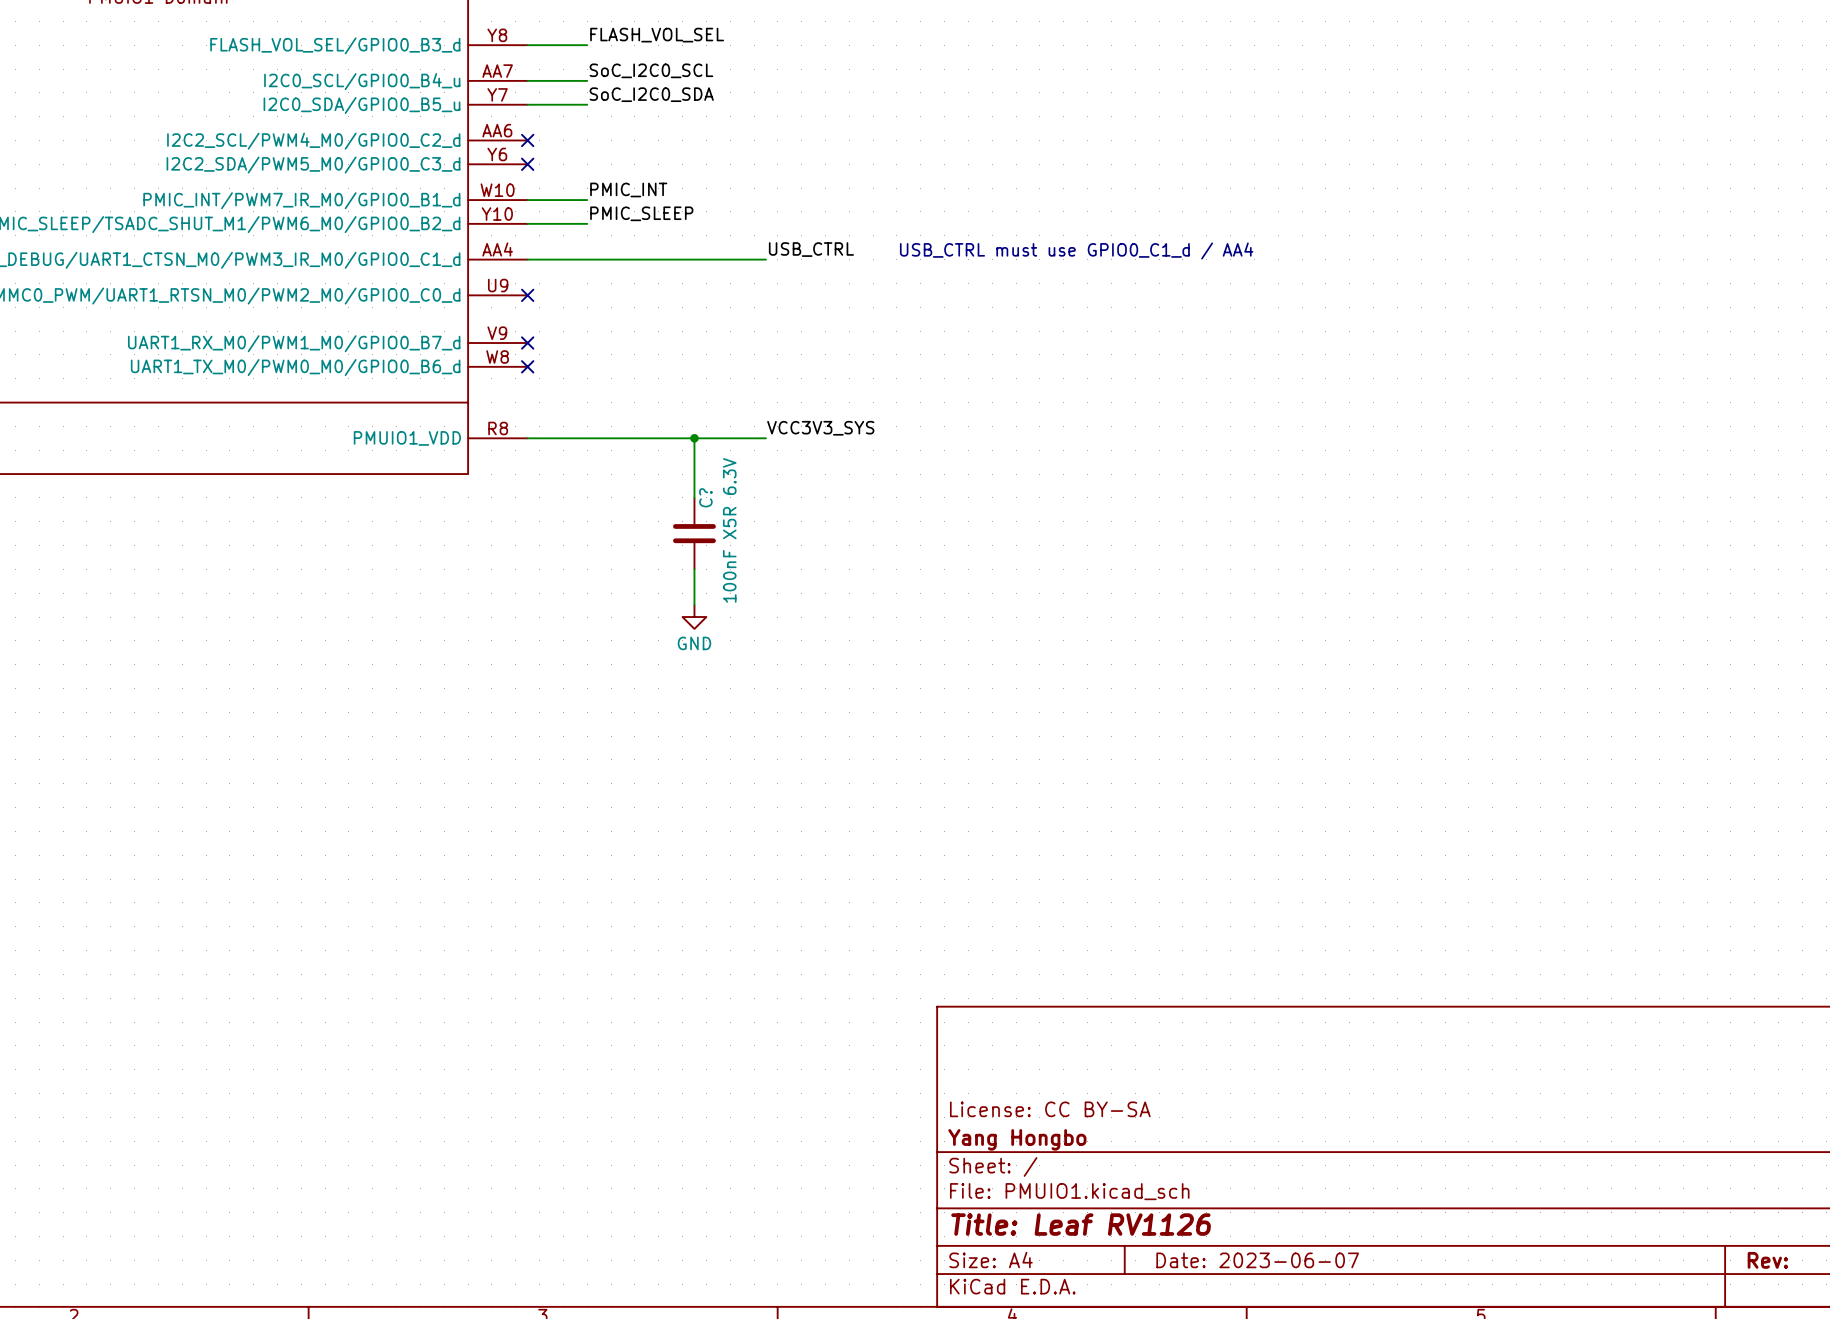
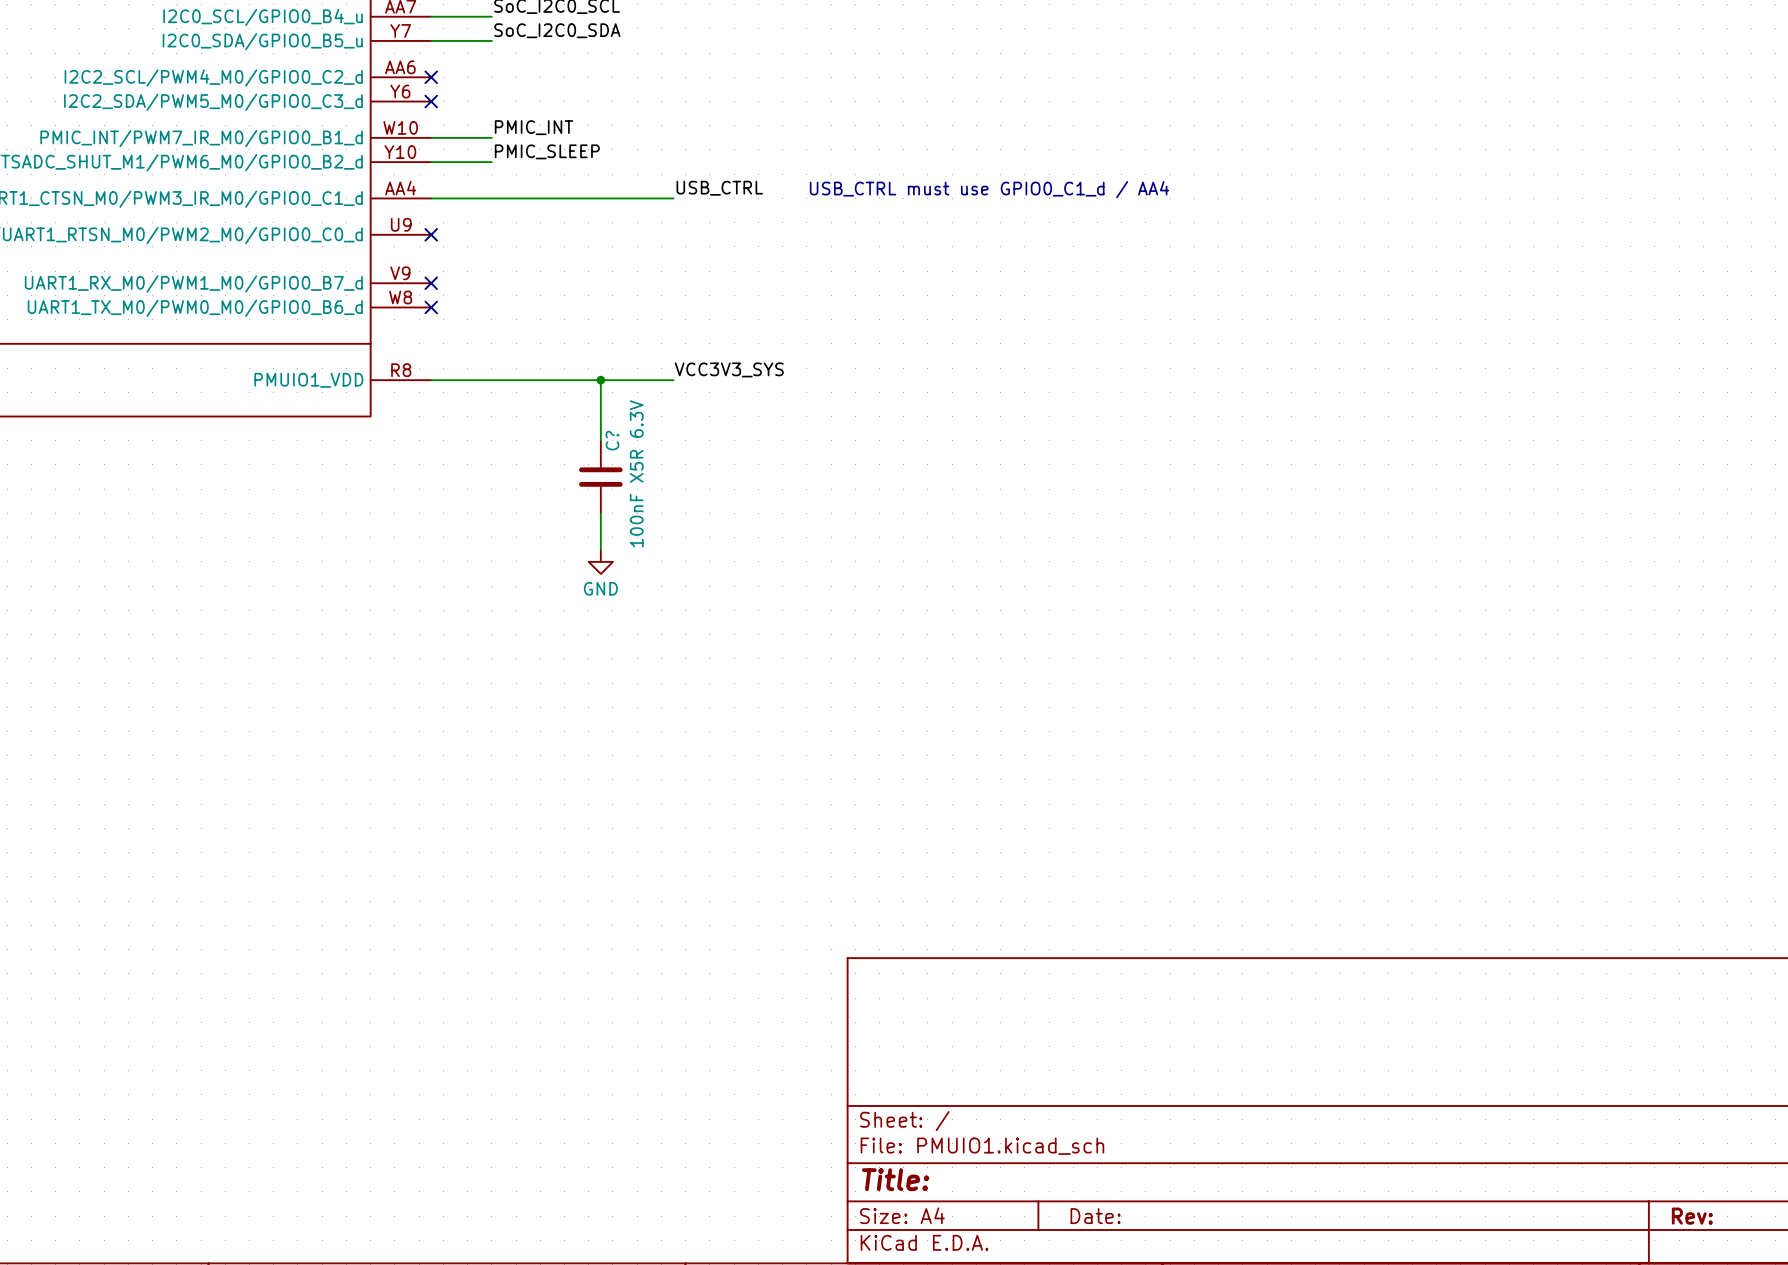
title block: License: CC BY-SA (1050, 1109) -> none
title block: Yang Hongbo (1017, 1139) -> none
title block: Title: Leaf RV1126 (1081, 1224) -> Title: (895, 1179)
title block: Date: 2023-06-07 (1257, 1260) -> Date: (1095, 1216)

